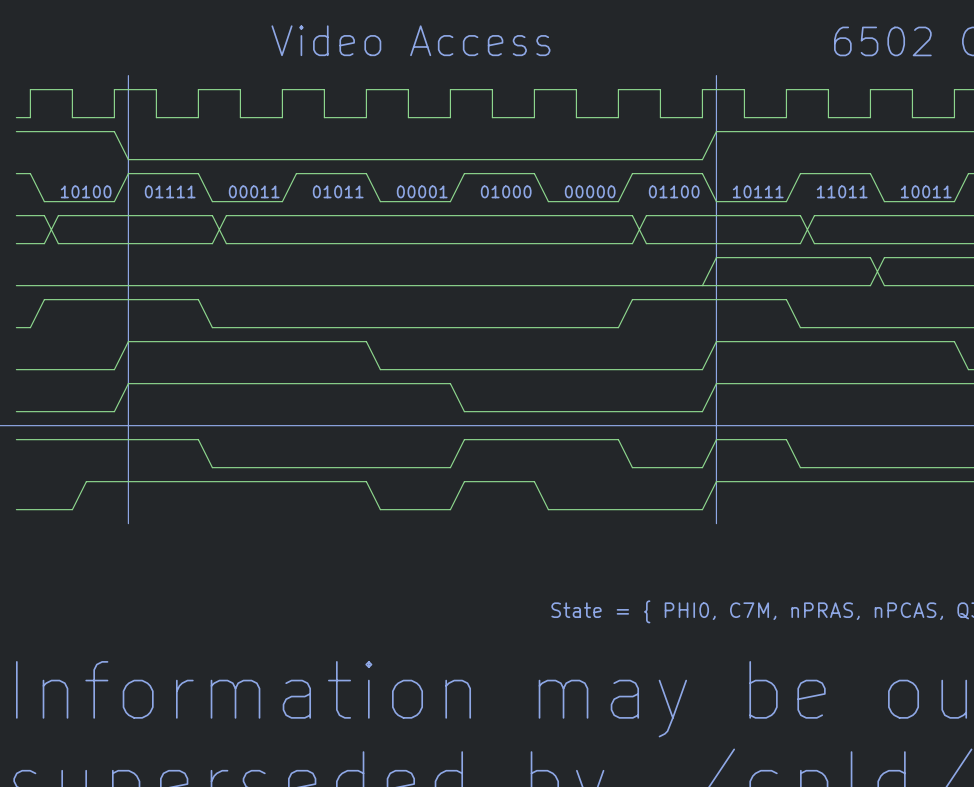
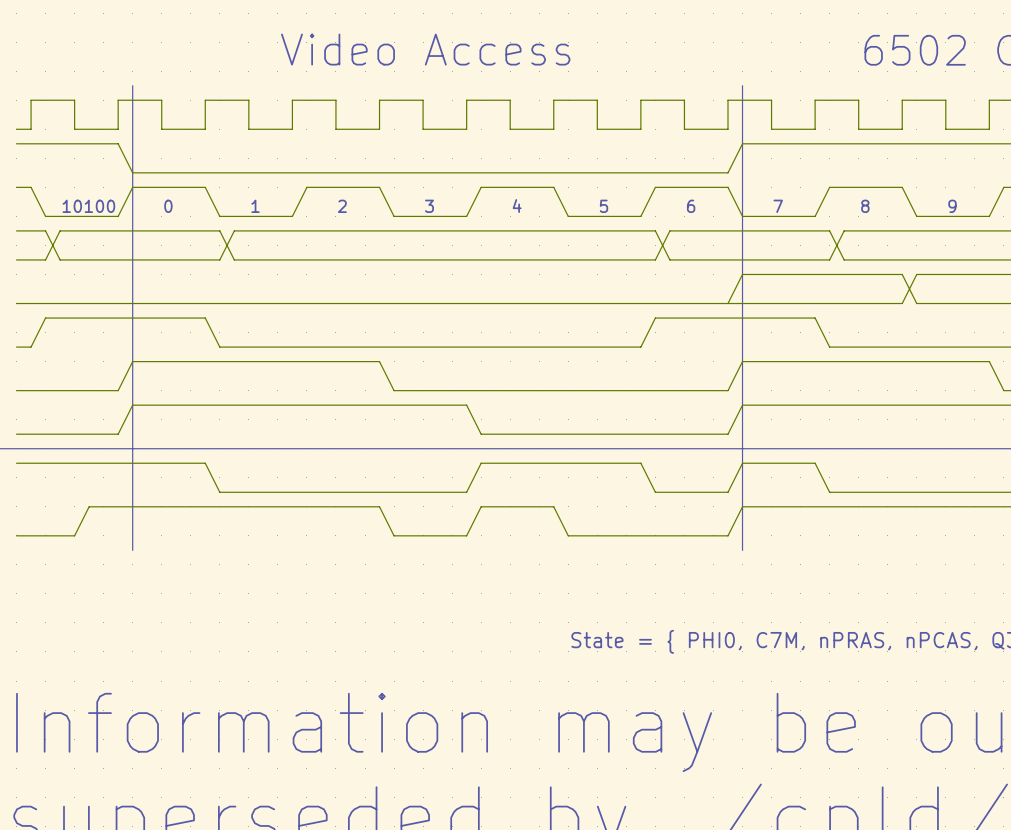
text: none -> 0 (168, 206)
text: 01111 (170, 191) -> none
text: none -> 1 (255, 206)
text: 00011 (254, 191) -> none
text: none -> 2 (342, 206)
text: 01011 (338, 191) -> none
text: none -> 3 (429, 206)
text: 00001 (422, 191) -> none
text: none -> 4 (517, 206)
text: 01000 (506, 191) -> none
text: none -> 5 (603, 206)
text: 00000 (590, 191) -> none
text: none -> 6 (691, 206)
text: 01100 (674, 191) -> none
text: none -> 7 (778, 206)
text: 10111 (758, 191) -> none
text: none -> 8 (865, 206)
text: 11011 (842, 191) -> none
text: none -> 9 (952, 206)
text: 10011 (926, 191) -> none

